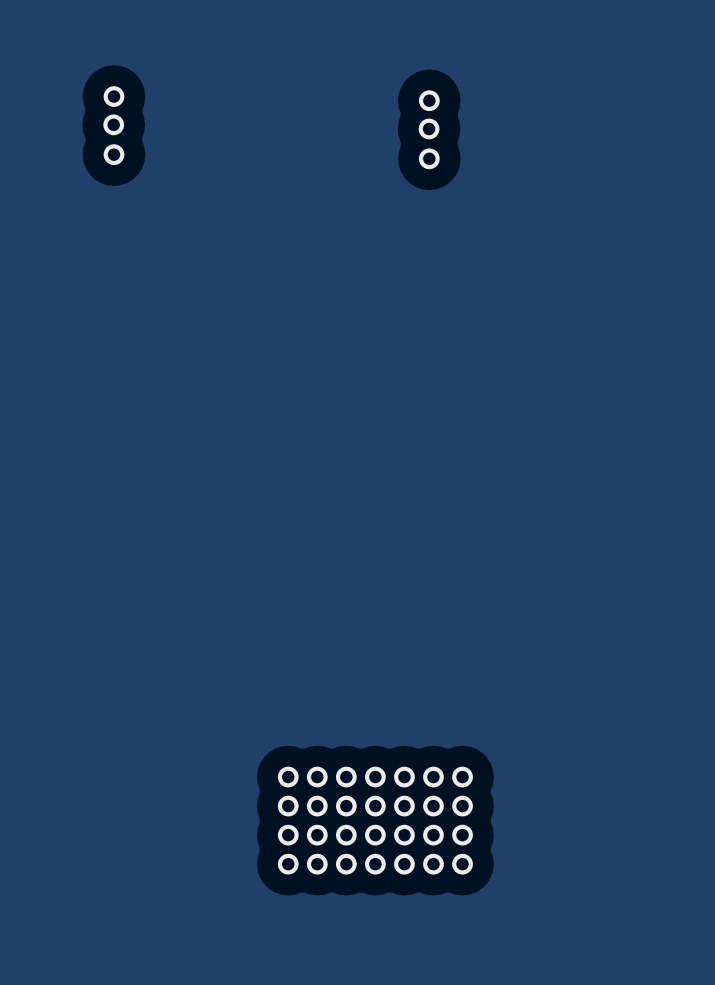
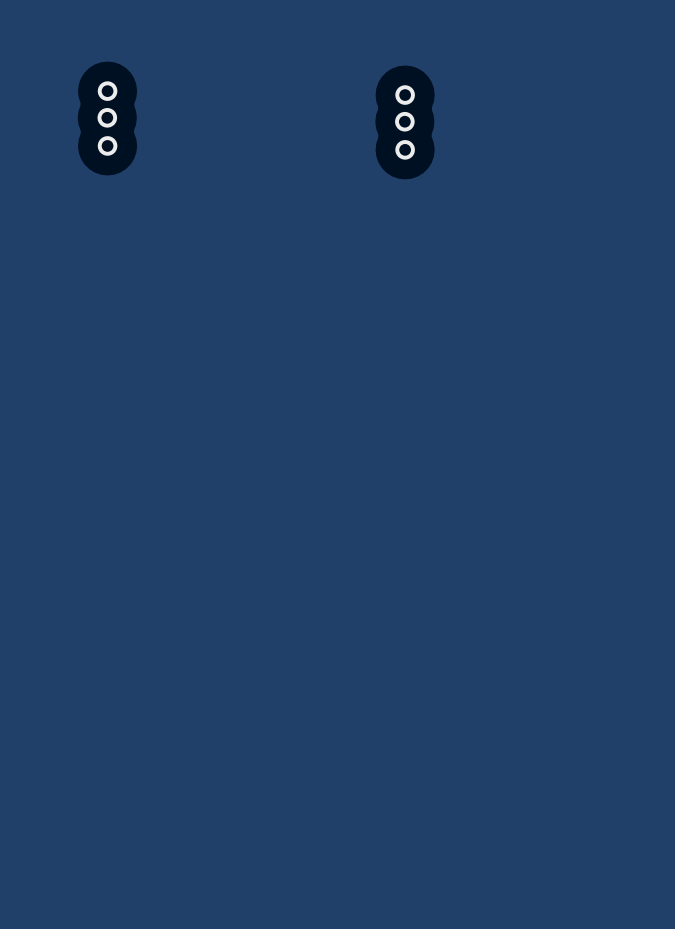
via: (288, 777) -> none
via: (317, 777) -> none
via: (346, 777) -> none
via: (375, 777) -> none
via: (404, 777) -> none
via: (433, 777) -> none
via: (462, 777) -> none
via: (288, 806) -> none
via: (317, 806) -> none
via: (346, 806) -> none
via: (375, 806) -> none
via: (404, 806) -> none
via: (433, 806) -> none
via: (462, 806) -> none
via: (288, 835) -> none
via: (317, 835) -> none
via: (346, 835) -> none
via: (375, 835) -> none
via: (404, 835) -> none
via: (433, 835) -> none
via: (462, 835) -> none
via: (288, 864) -> none
via: (317, 864) -> none
via: (346, 864) -> none
via: (375, 864) -> none
via: (404, 864) -> none
via: (433, 864) -> none
via: (462, 864) -> none

